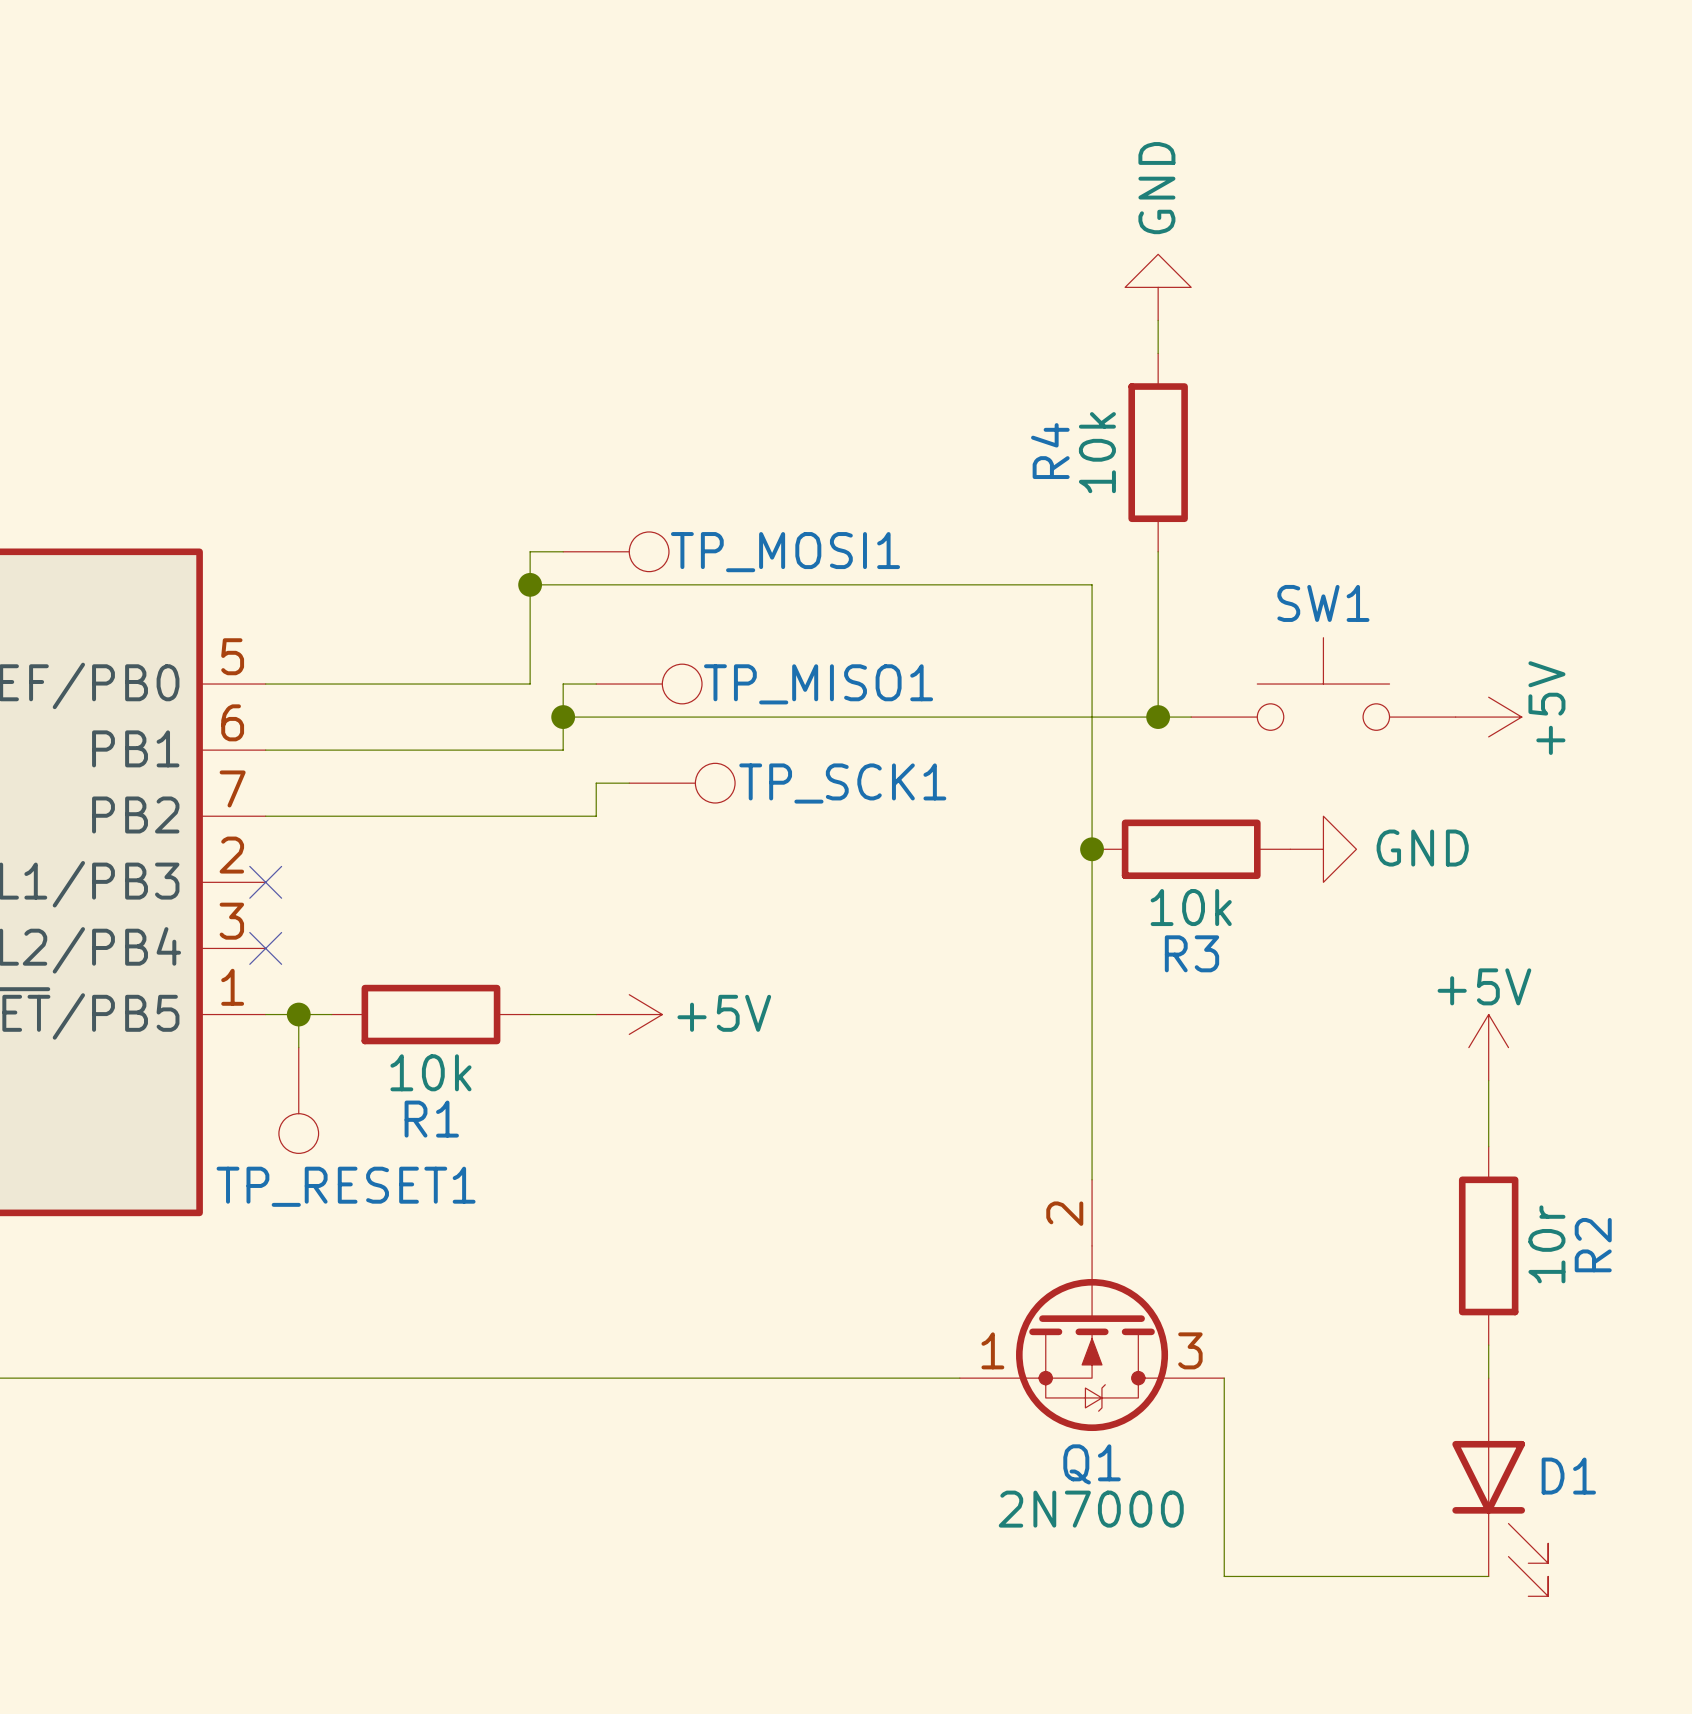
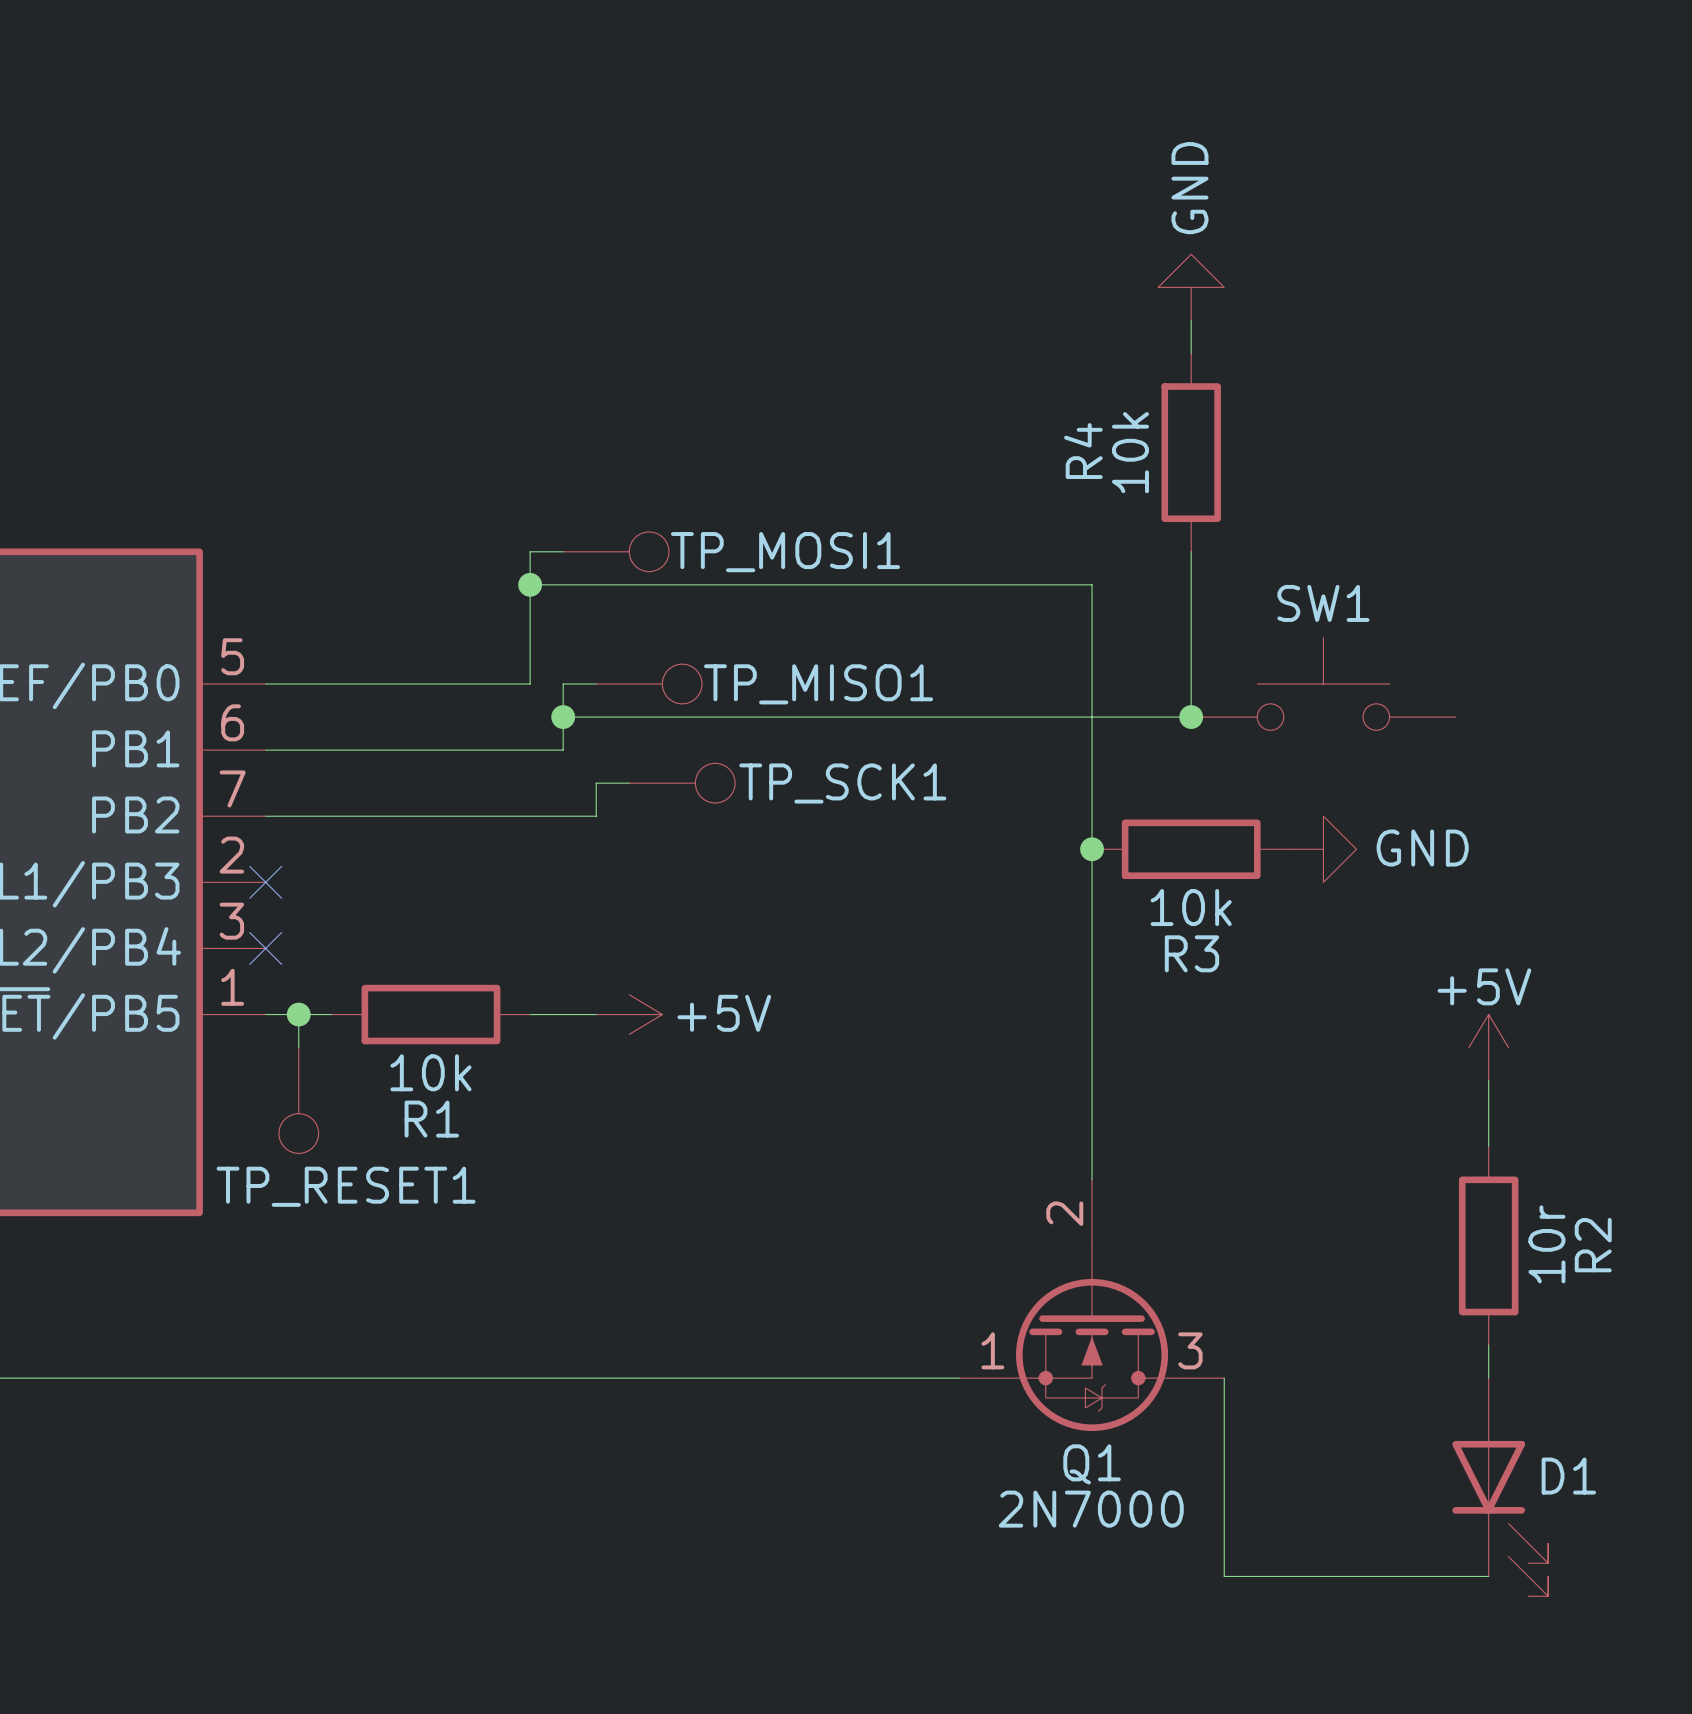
power symbol position: GND (1158, 287) -> GND (1191, 287)
wire: (1158, 320) (1158, 353) -> (1191, 320) (1191, 353)
R4 position: (1158, 452) -> (1191, 452)
wire: (1158, 551) (1158, 717) -> (1191, 551) (1191, 717)
junction position: (1158, 717) -> (1191, 717)
power symbol: +5V (1488, 717) -> none

